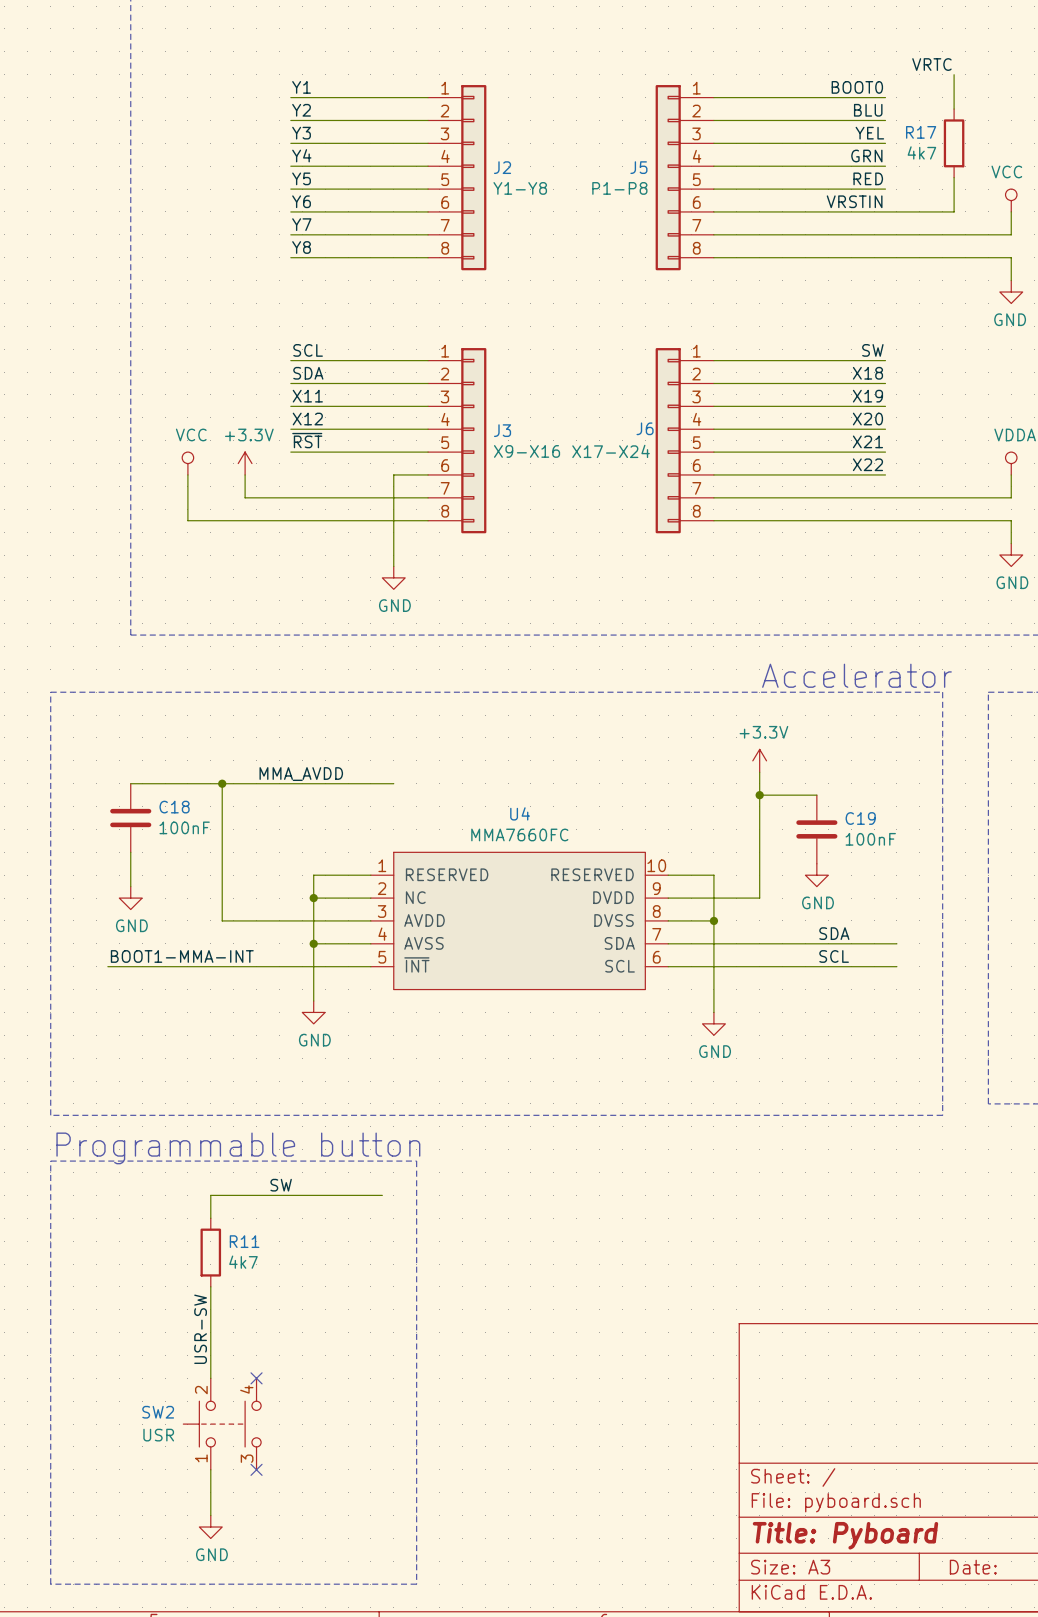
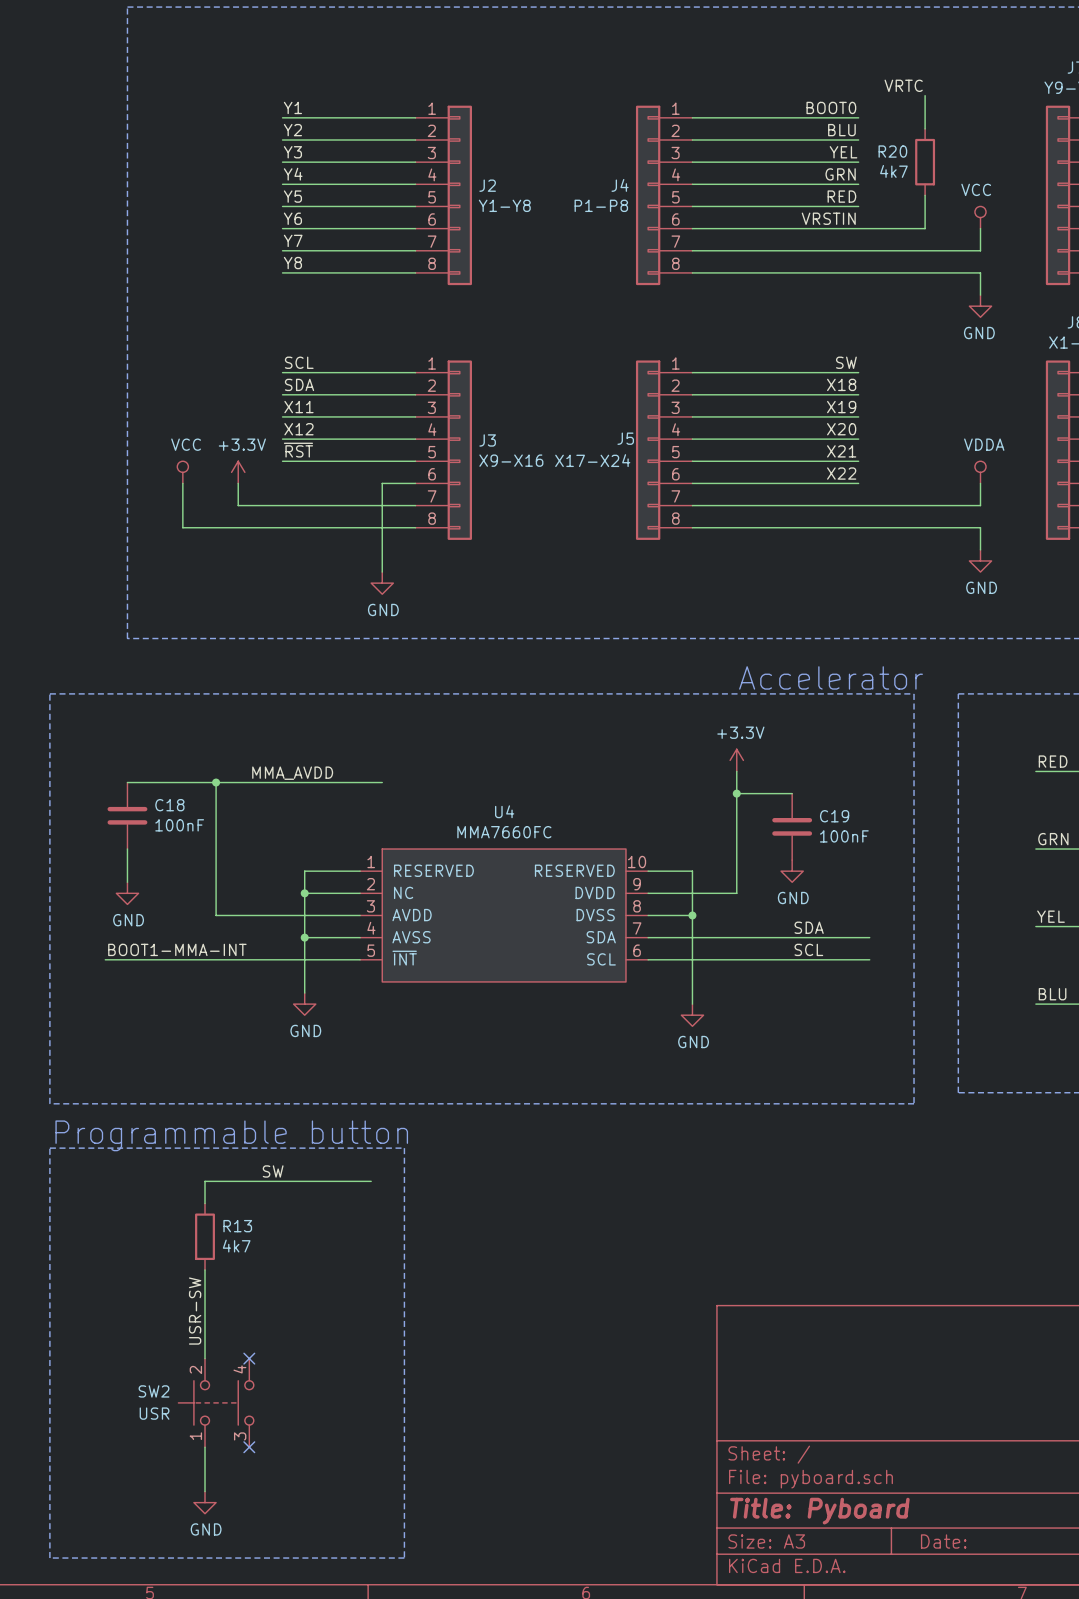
R17 name: R17 (921, 132) -> R20 (892, 151)
J5 name: J5 (638, 167) -> J4 (620, 185)
J6 name: J6 (645, 428) -> J5 (625, 438)
R11 name: R11 (244, 1241) -> R13 (237, 1226)

